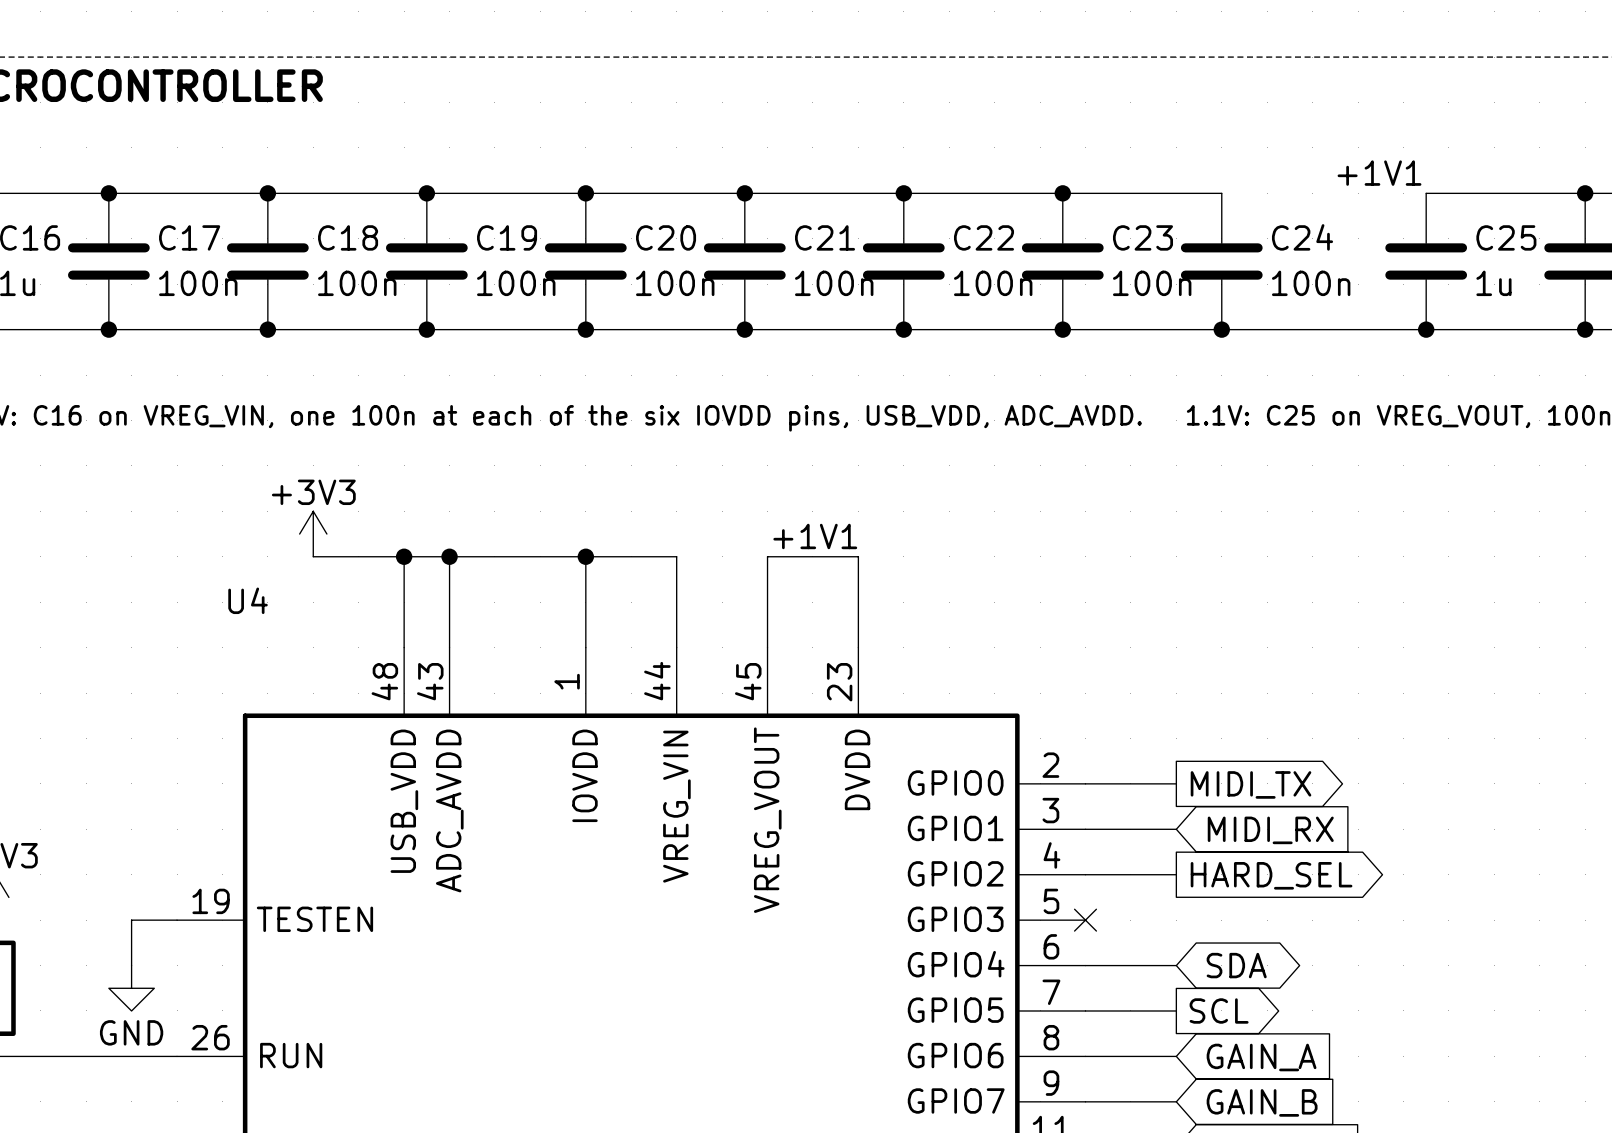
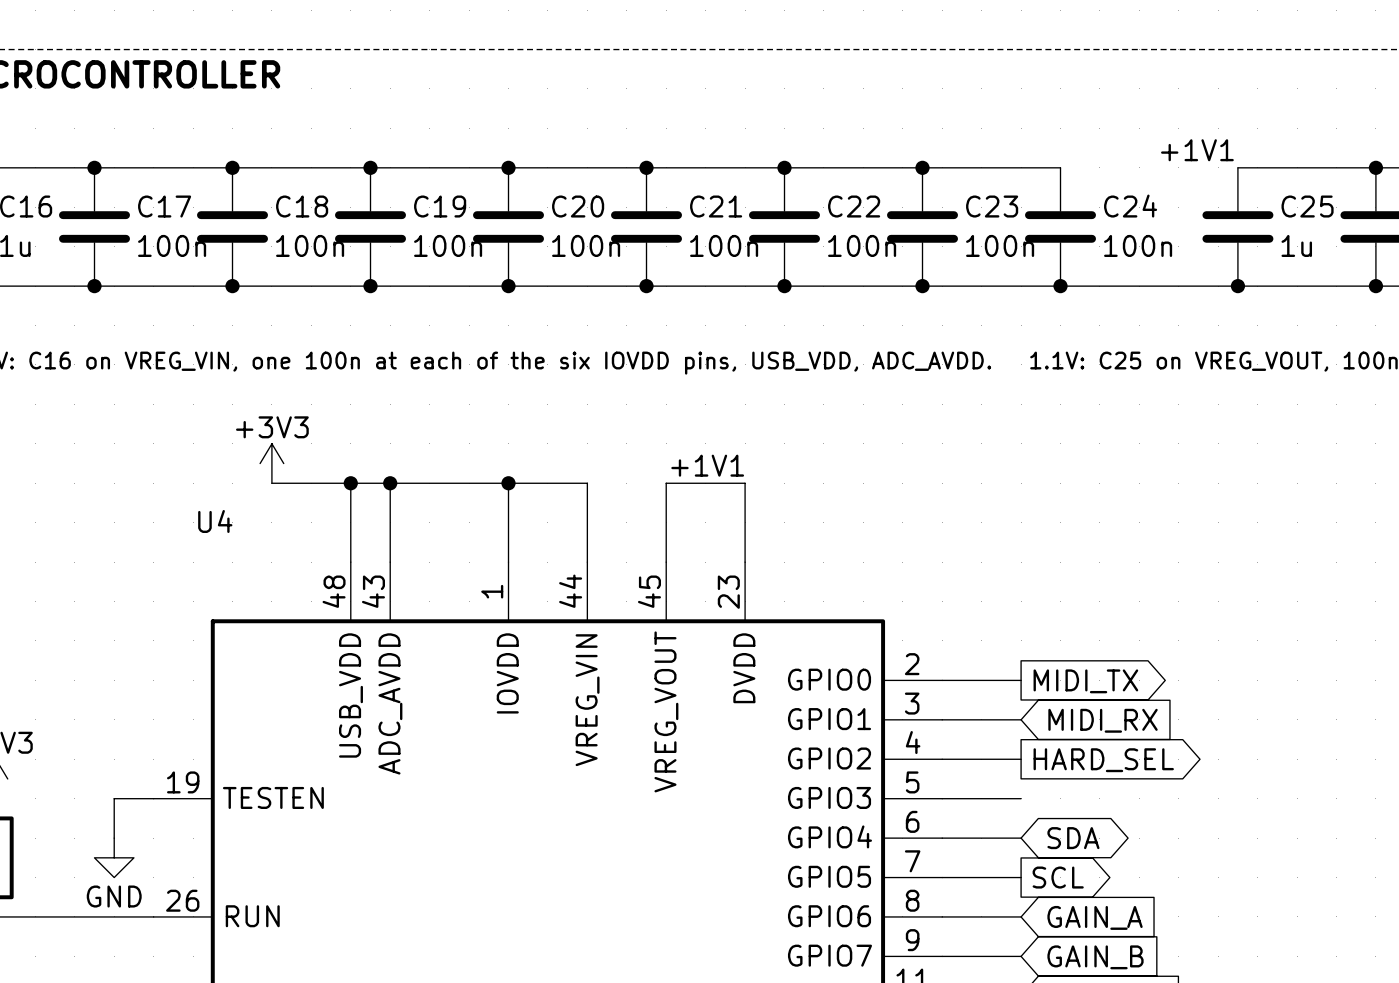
wire: none -> (942, 798) (1021, 798)
no-connect mark: (1085, 920) -> none

